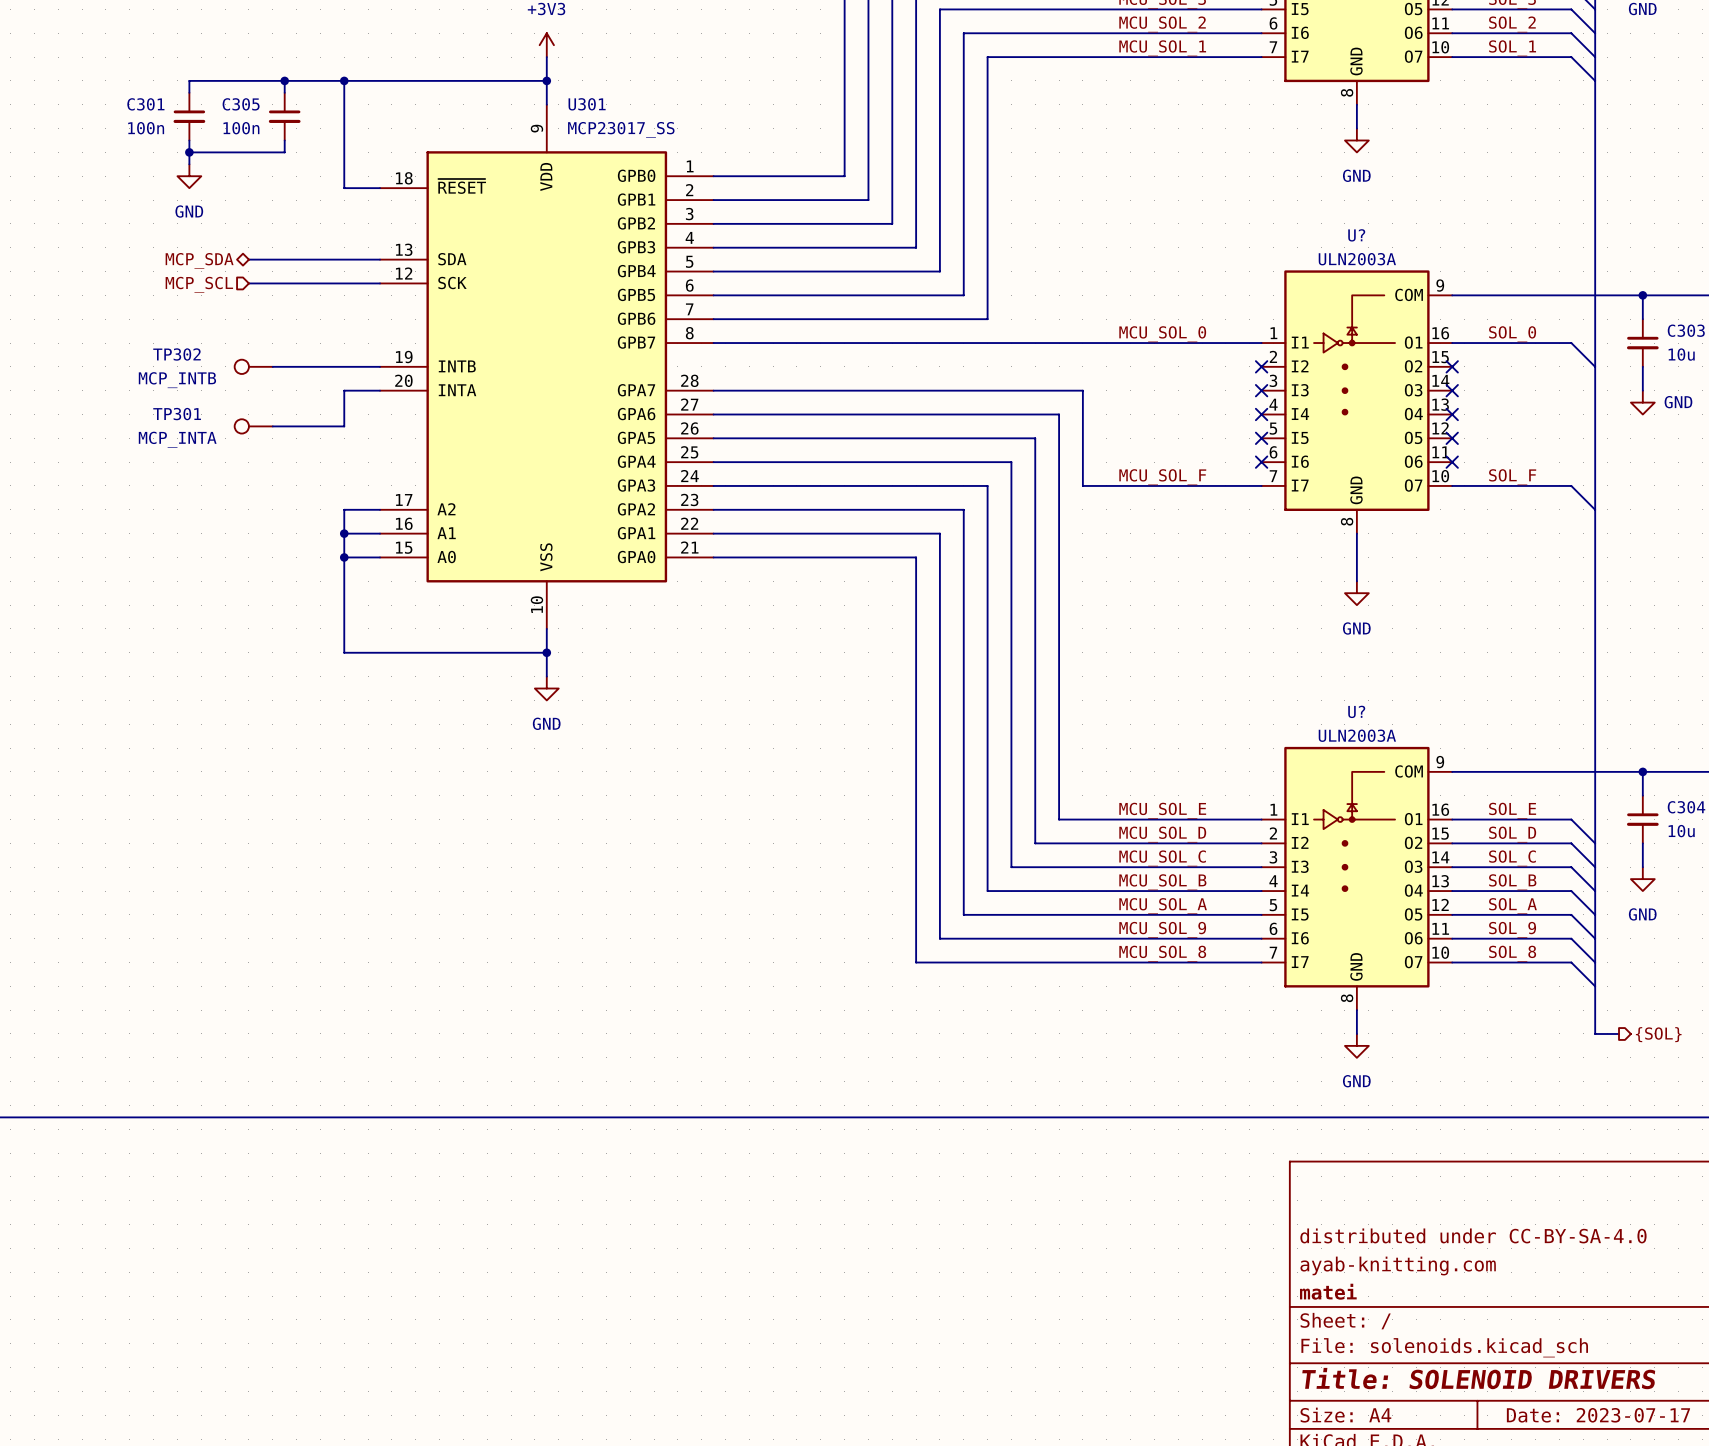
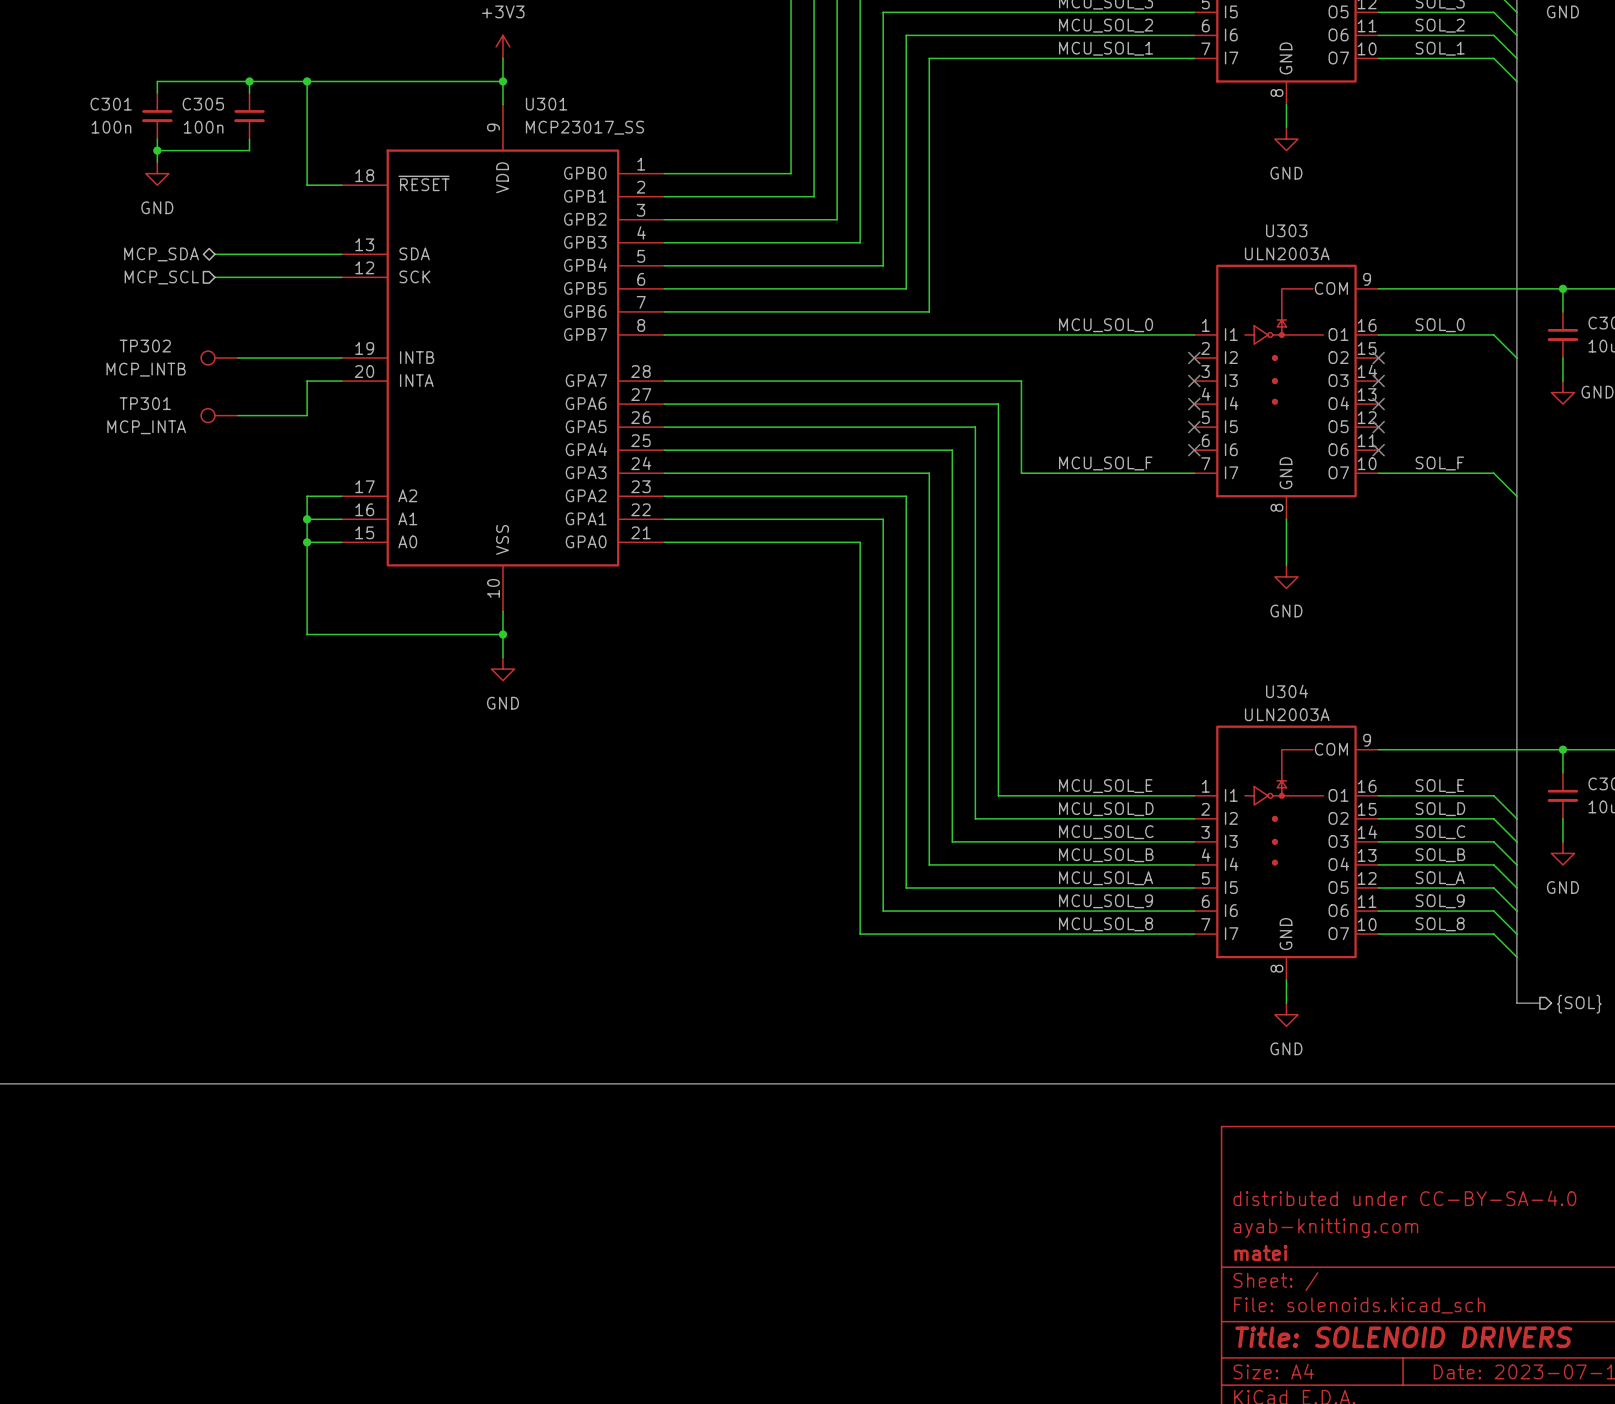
U? name: U? (1356, 235) -> U303 (1286, 230)
U? name: U? (1356, 711) -> U304 (1286, 691)

